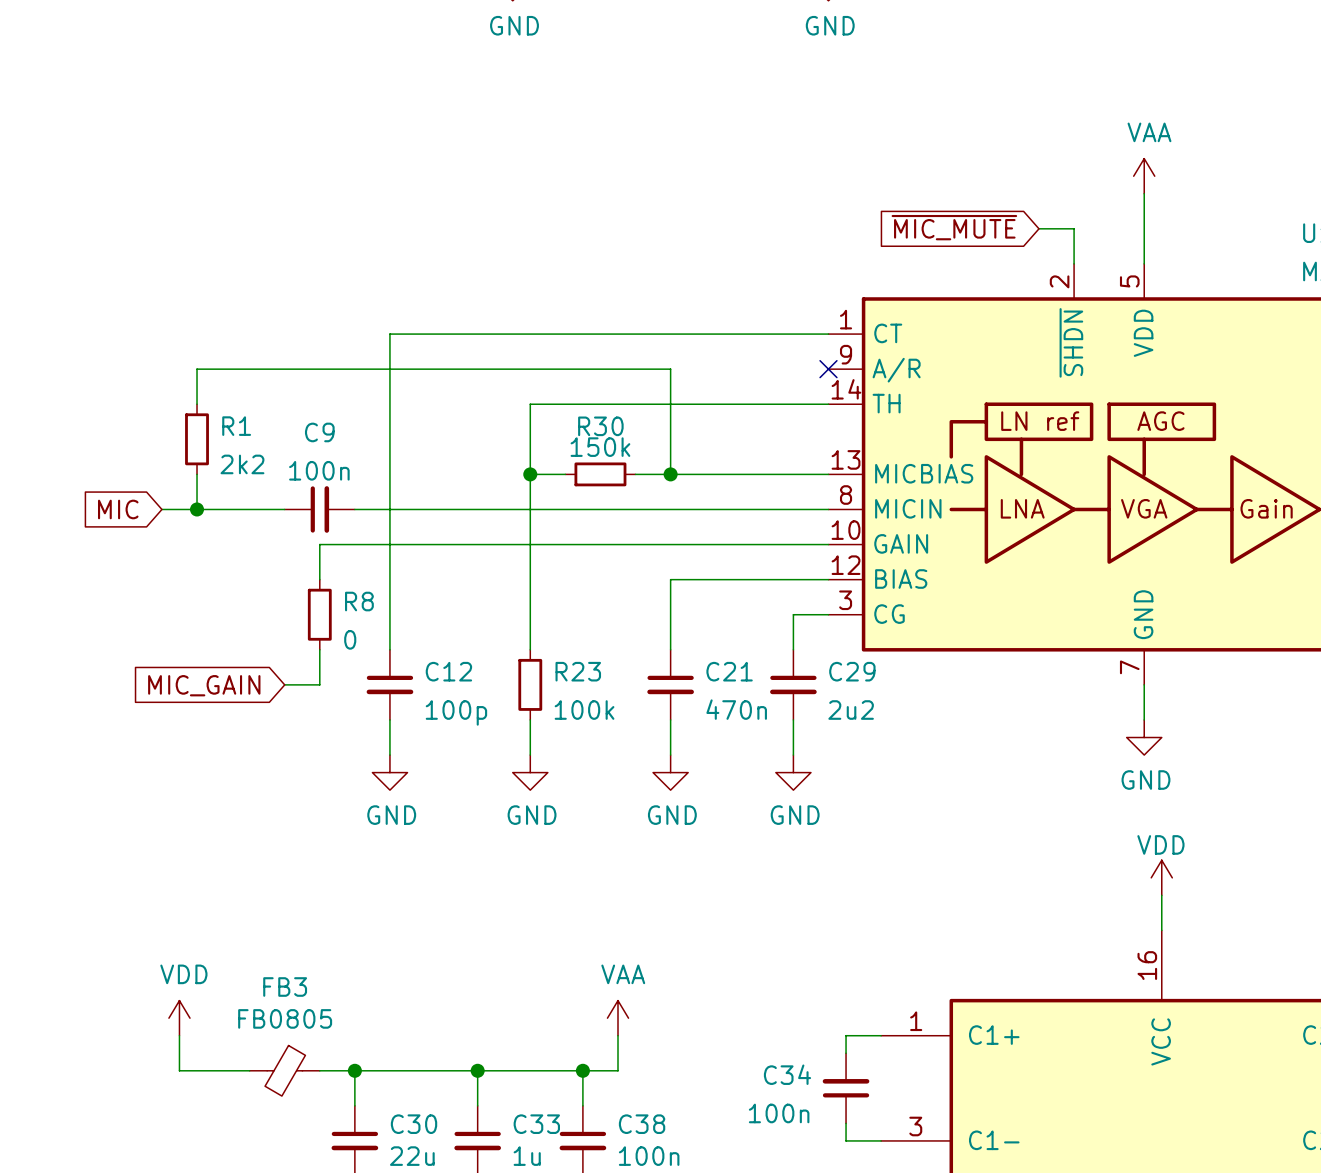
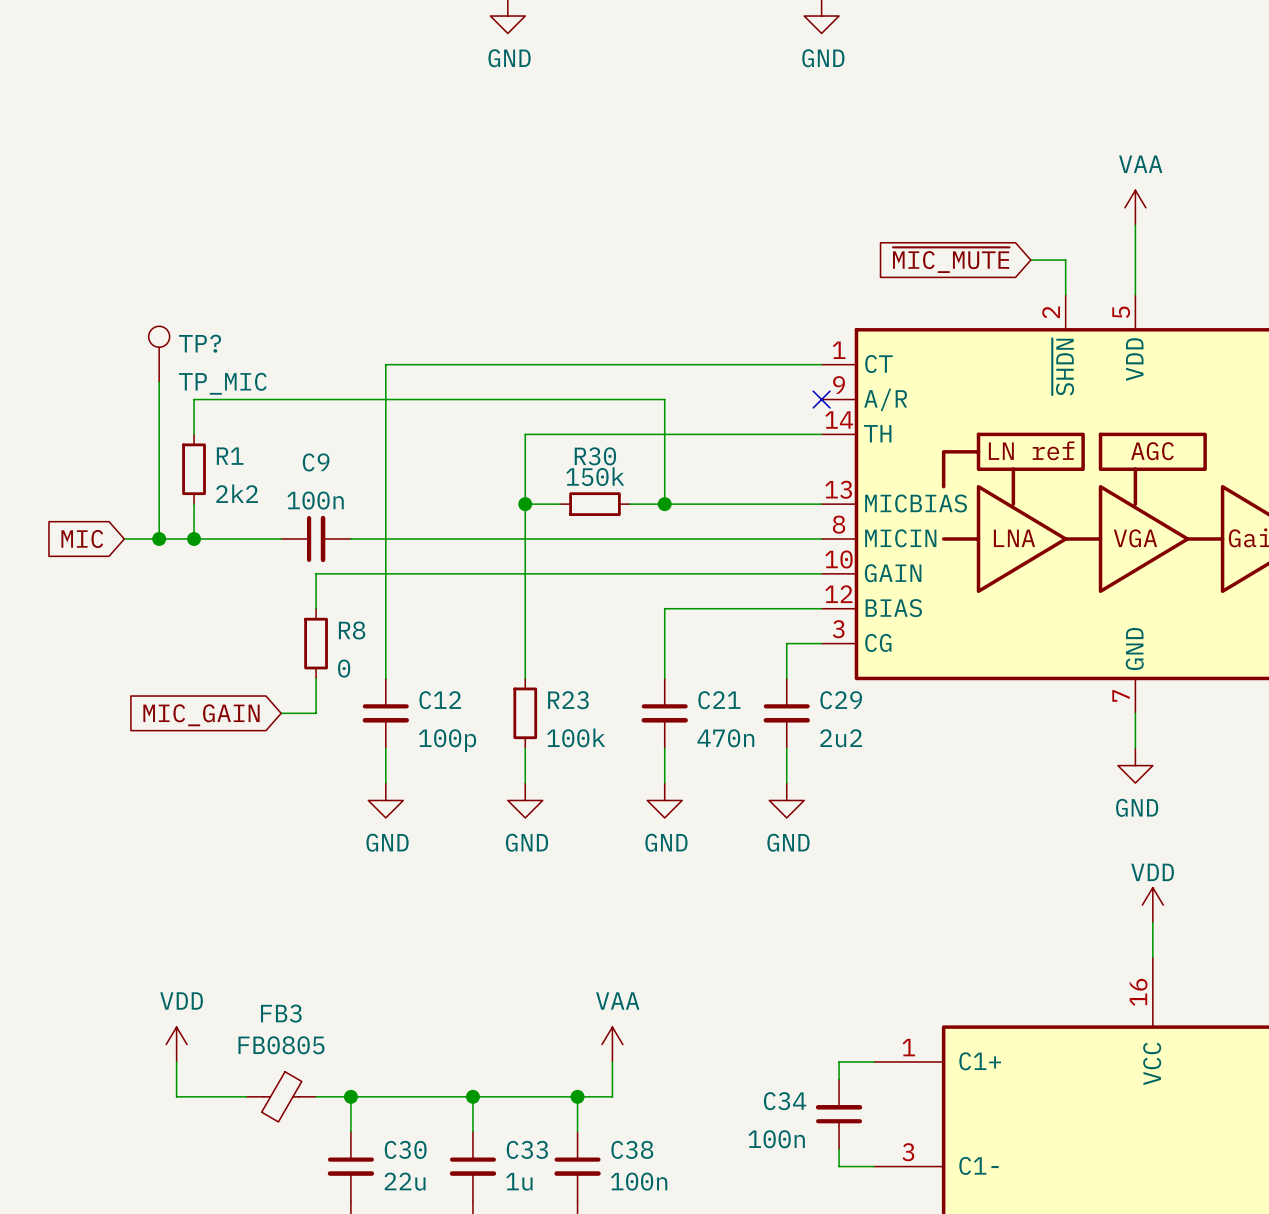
TP?: none -> TP_MIC (159, 354)
wire: none -> (159, 382) (159, 539) (124, 539)
global label position: MIC (118, 509) -> MIC (82, 539)
junction: none -> (159, 539)

